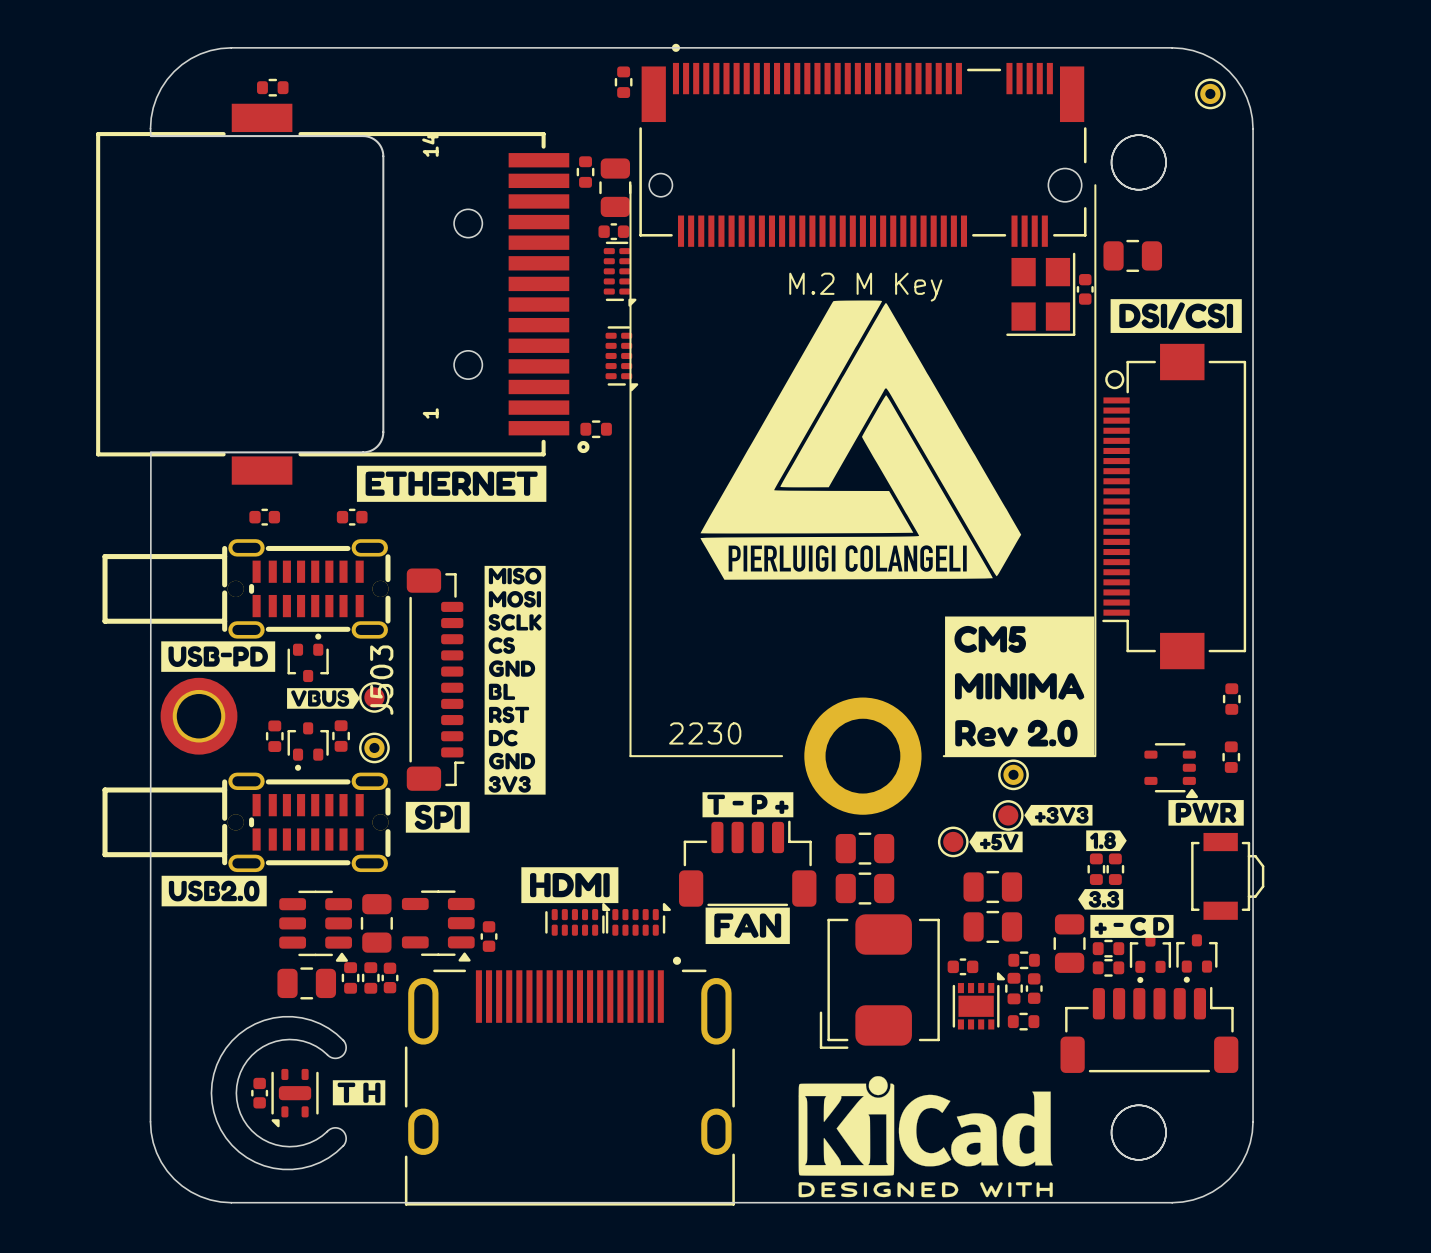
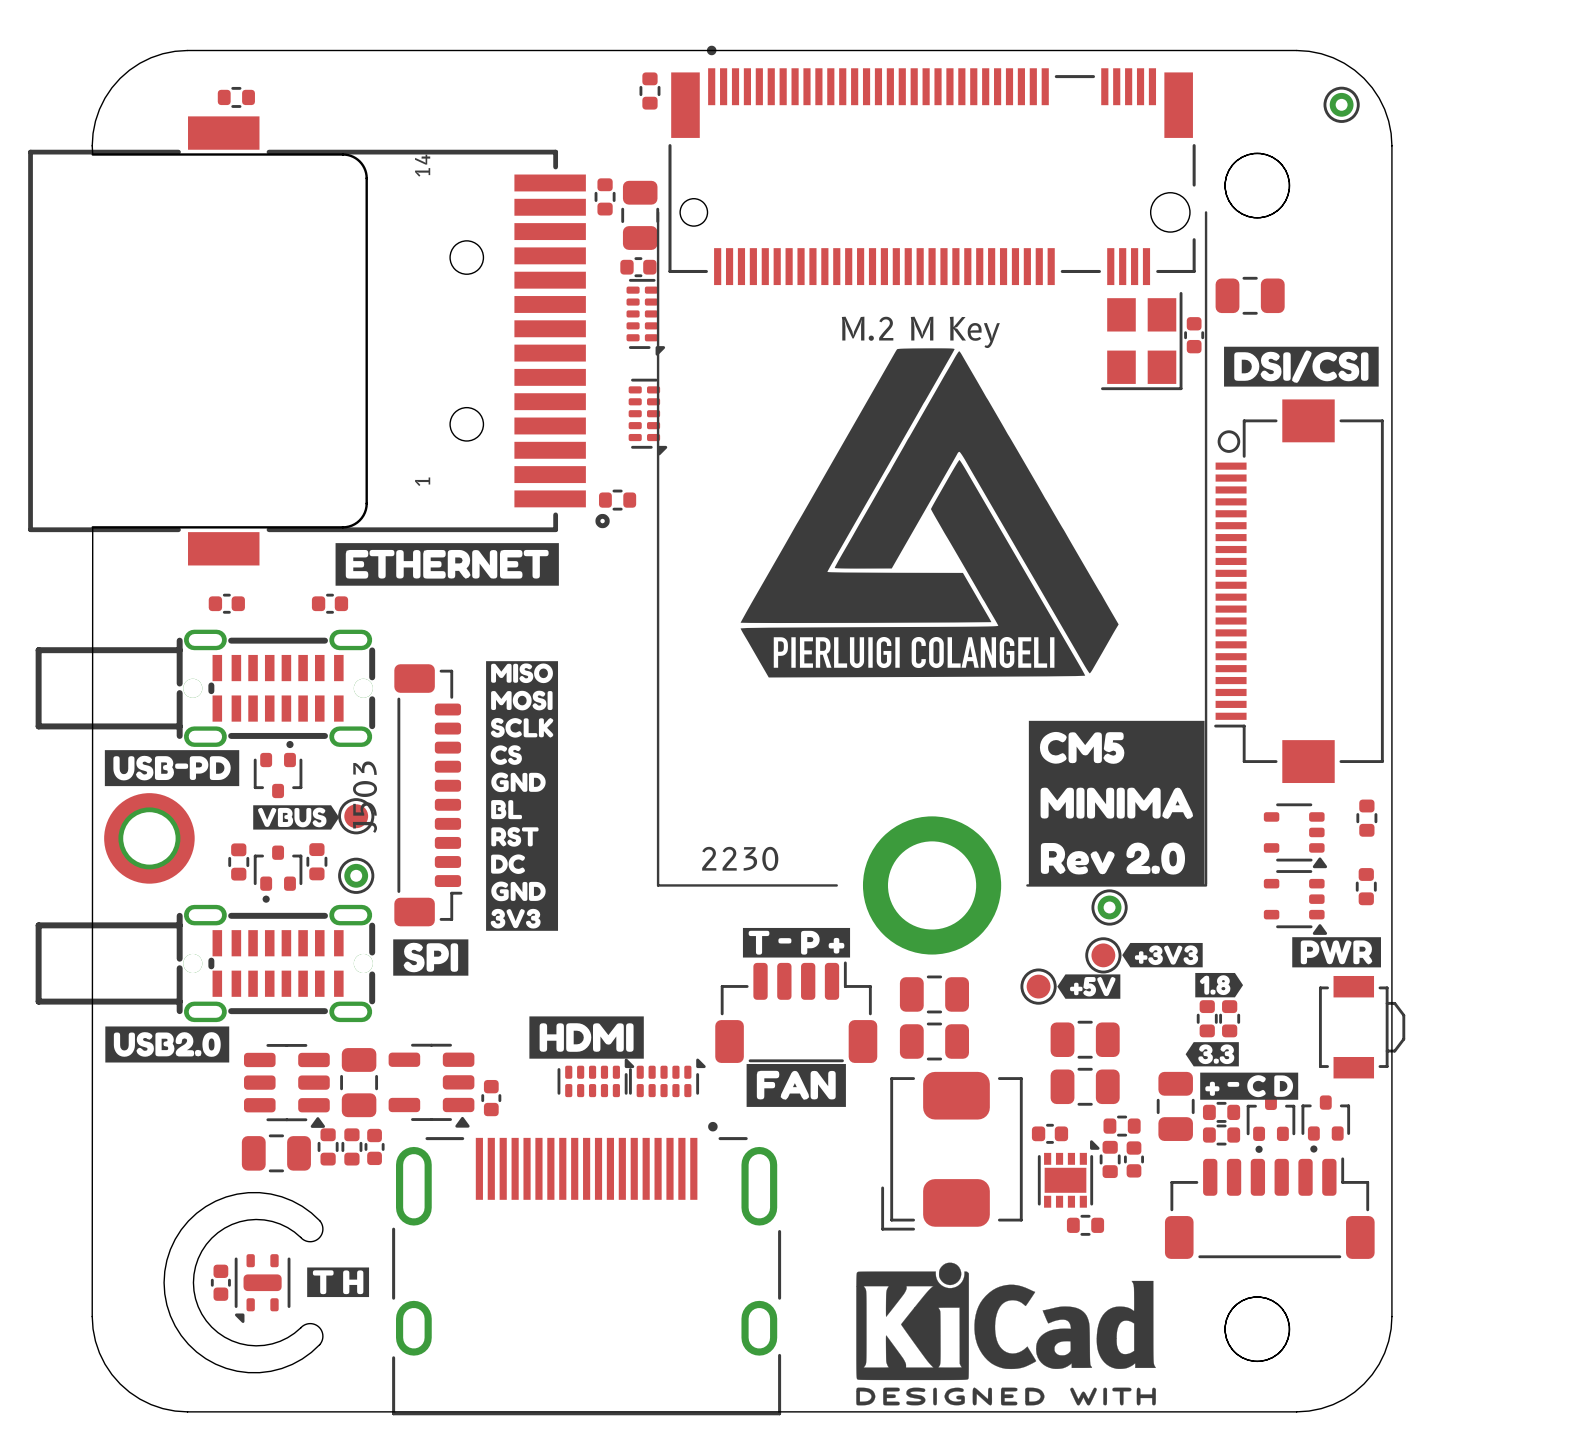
part: none -> (1295, 835)
part position: (1023, 1021) -> (1085, 1225)

